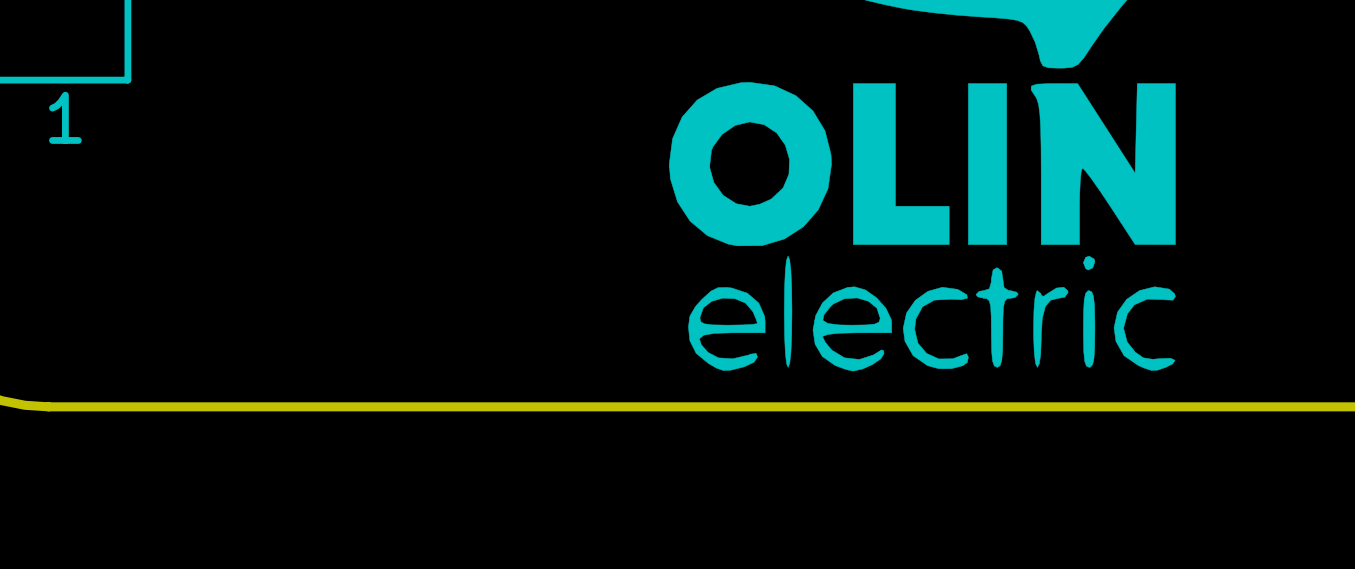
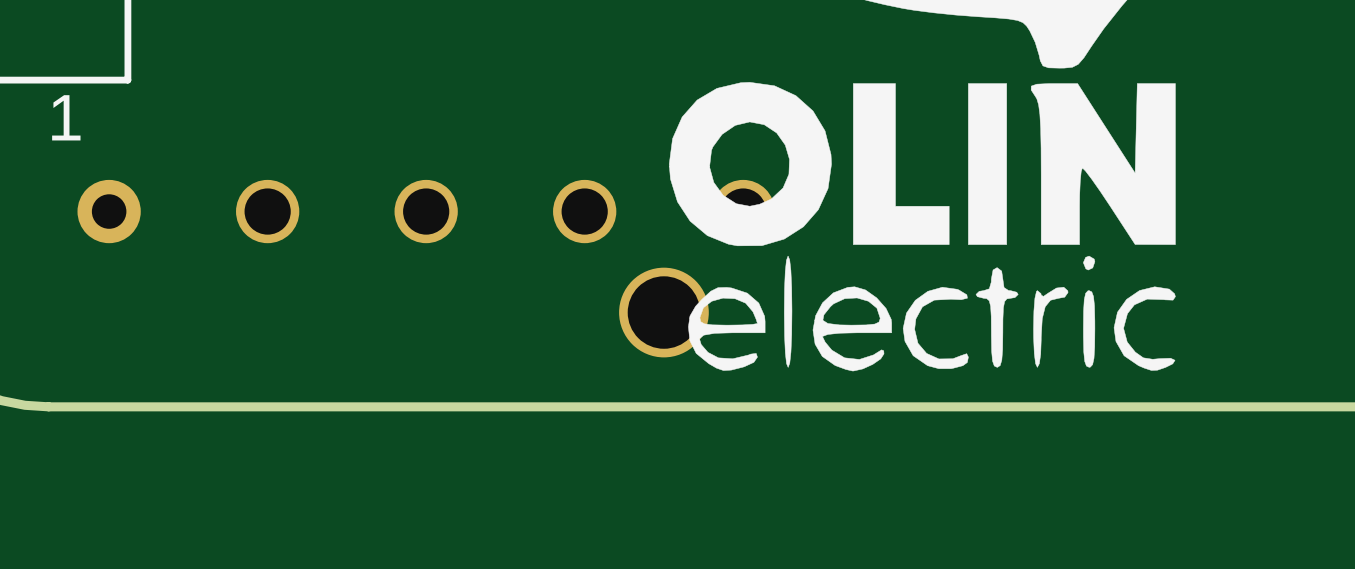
part: none -> (426, 268)

